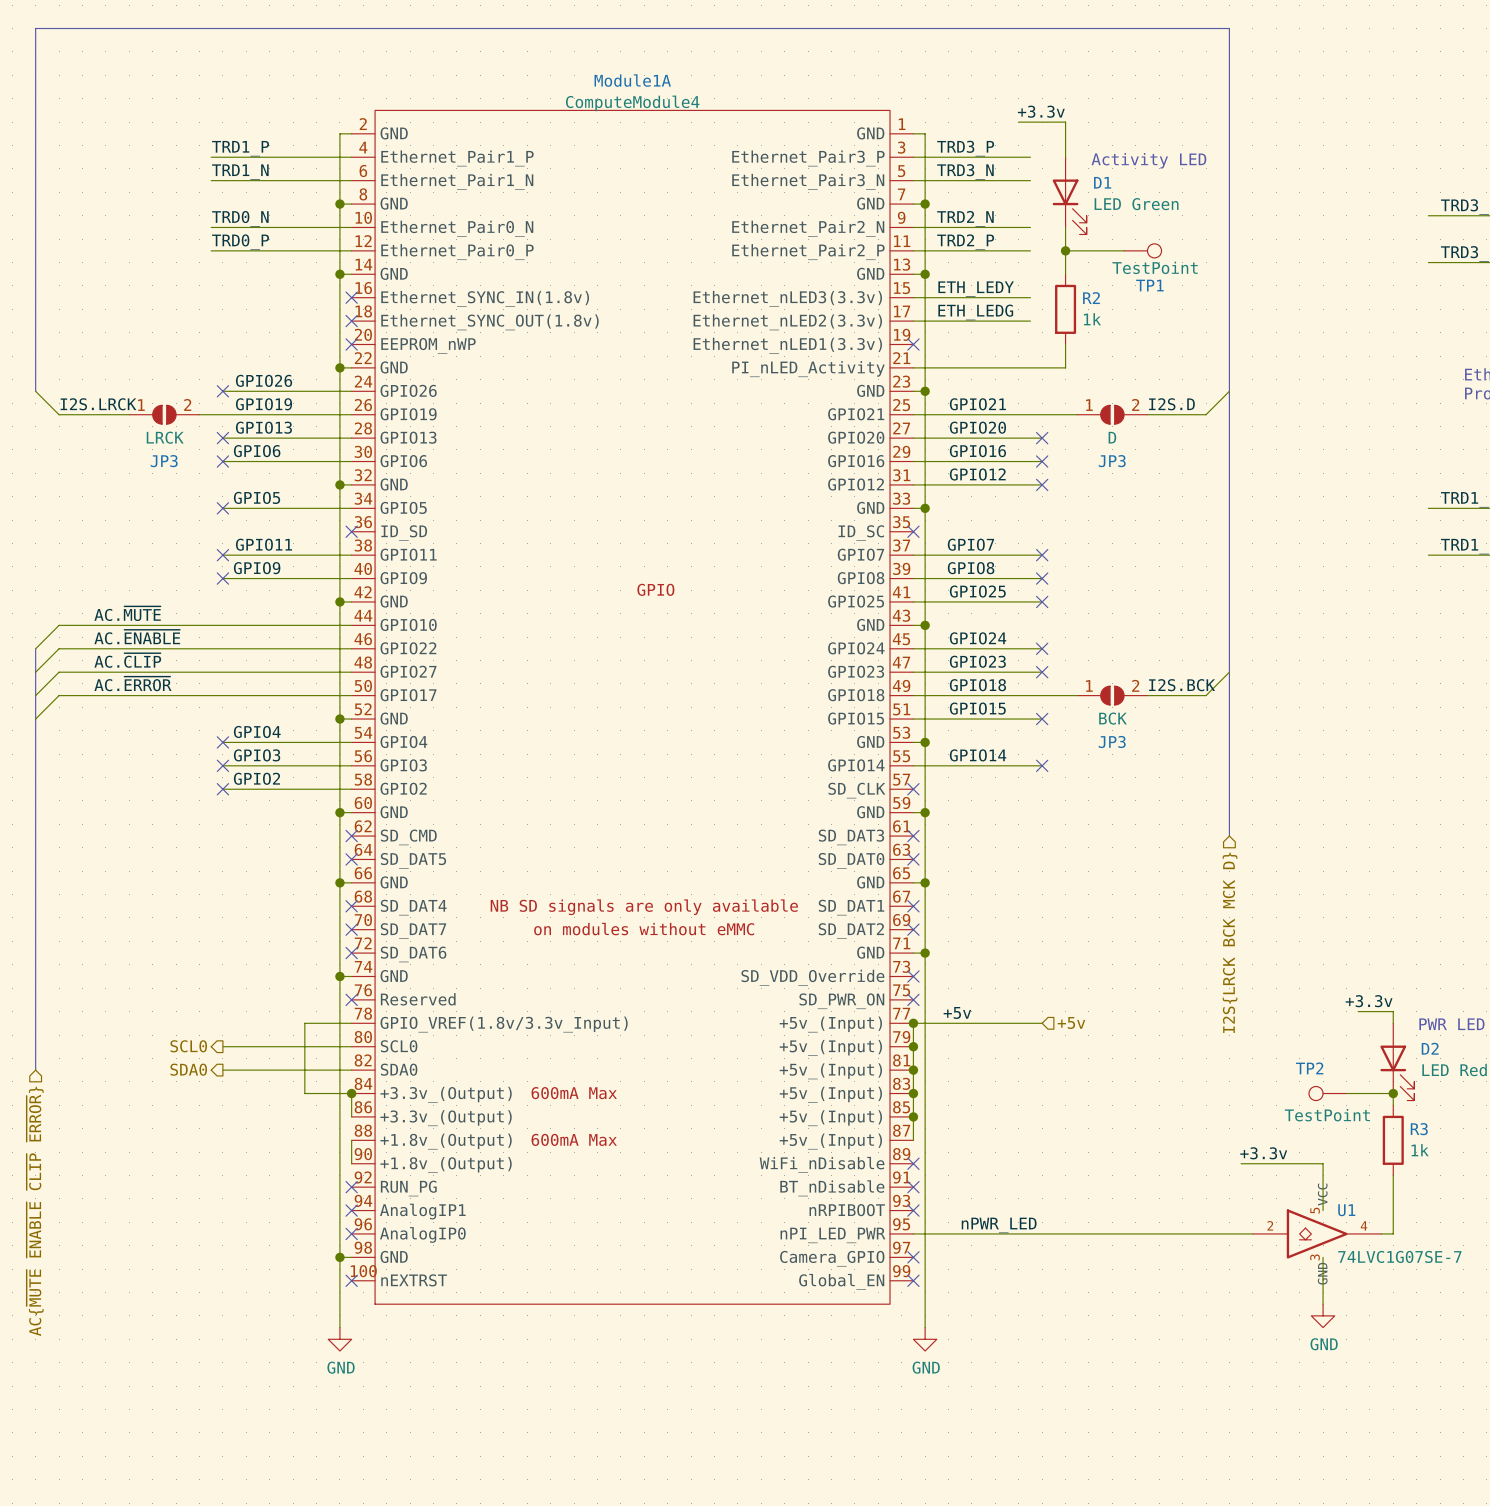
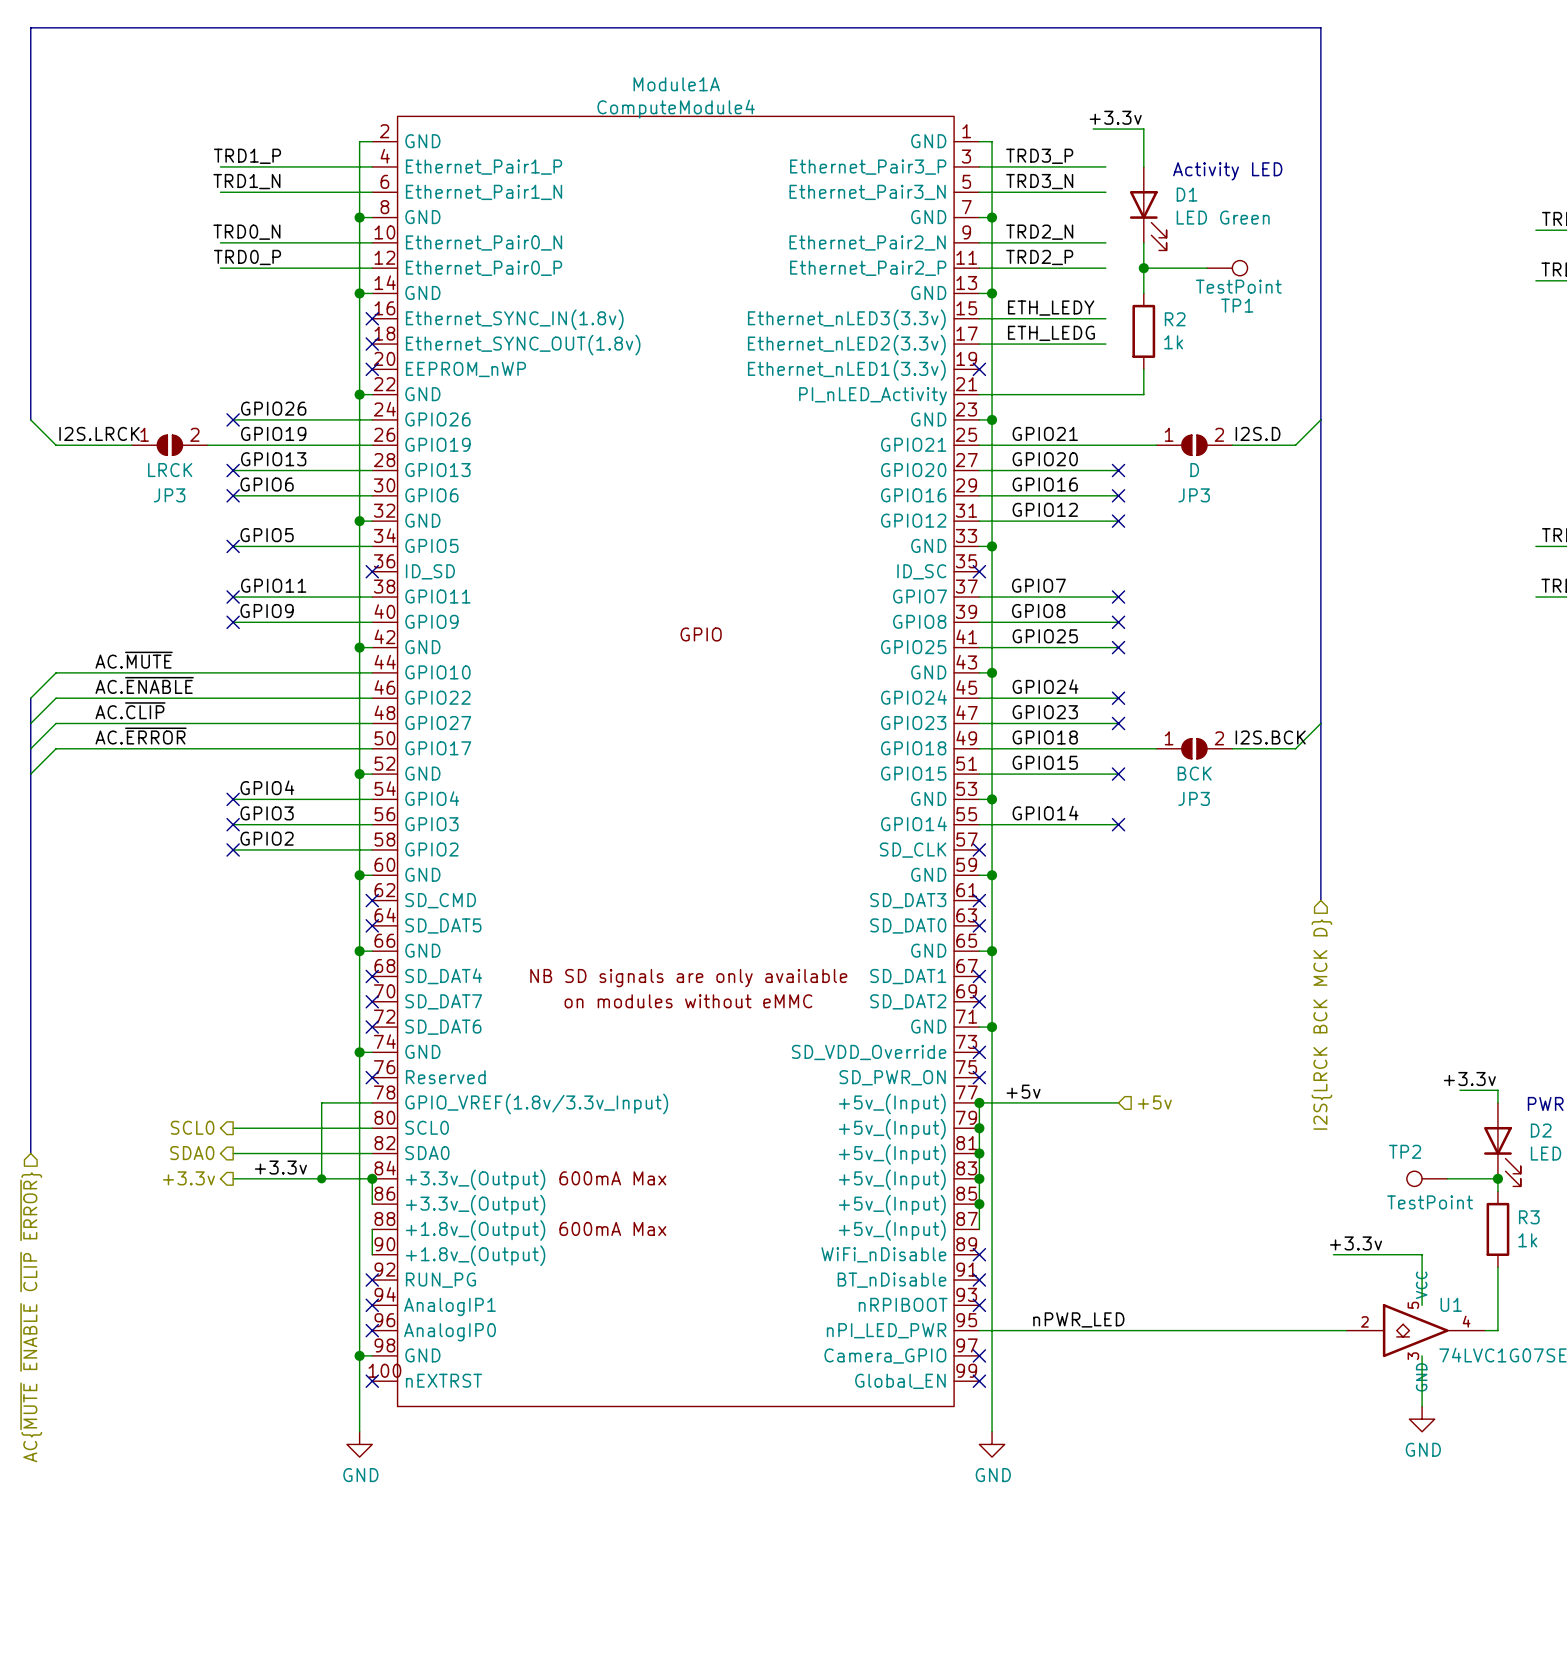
label: none -> +3.3v (280, 1167)
hierarchical label: none -> +3.3v (188, 1178)
wire: none -> (233, 1178) (321, 1178)
junction: none -> (321, 1178)

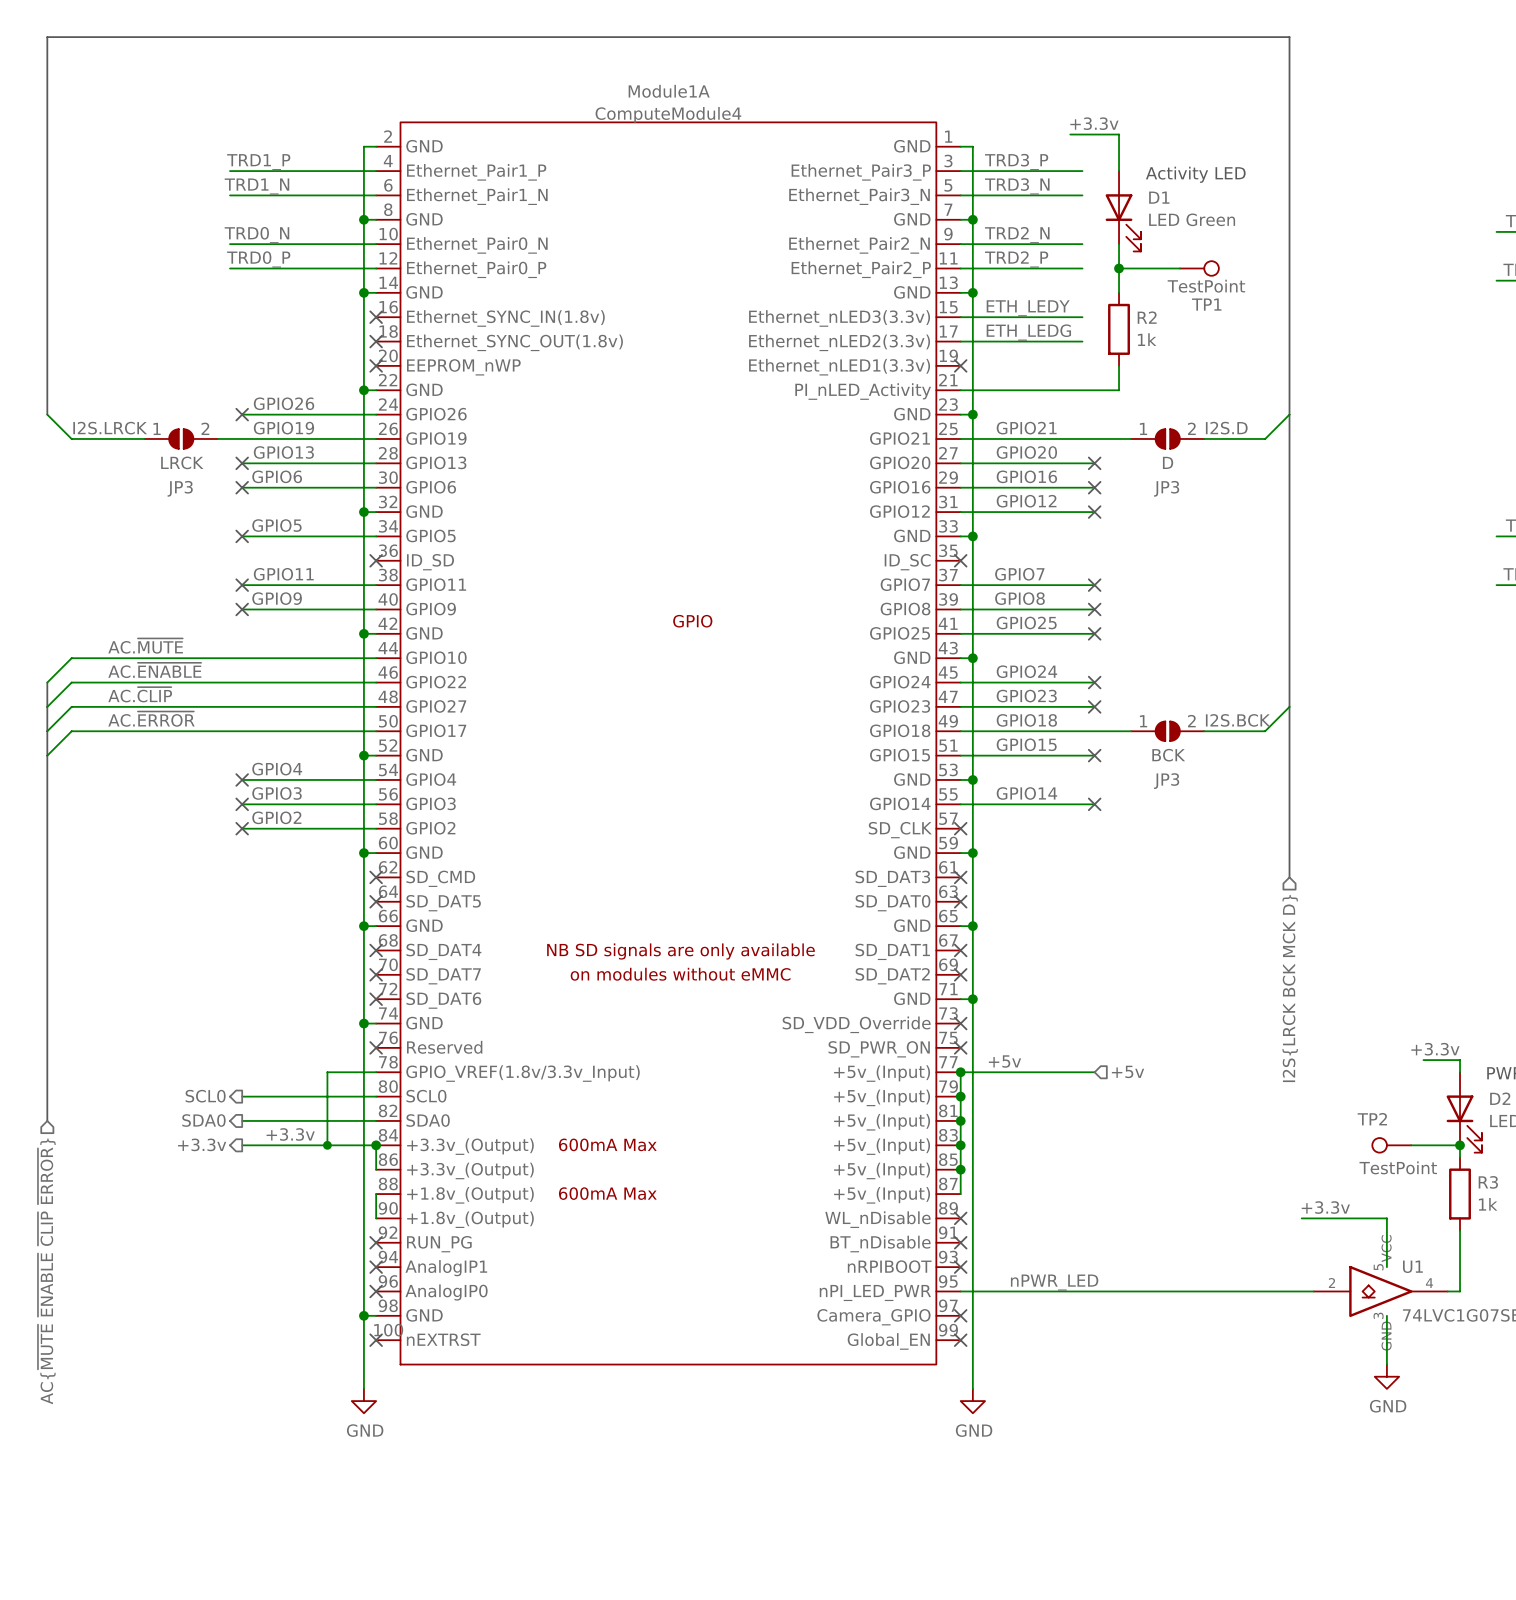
Module1A pin name: WiFi_nDisable (883, 1254) -> WL_nDisable (877, 1219)

